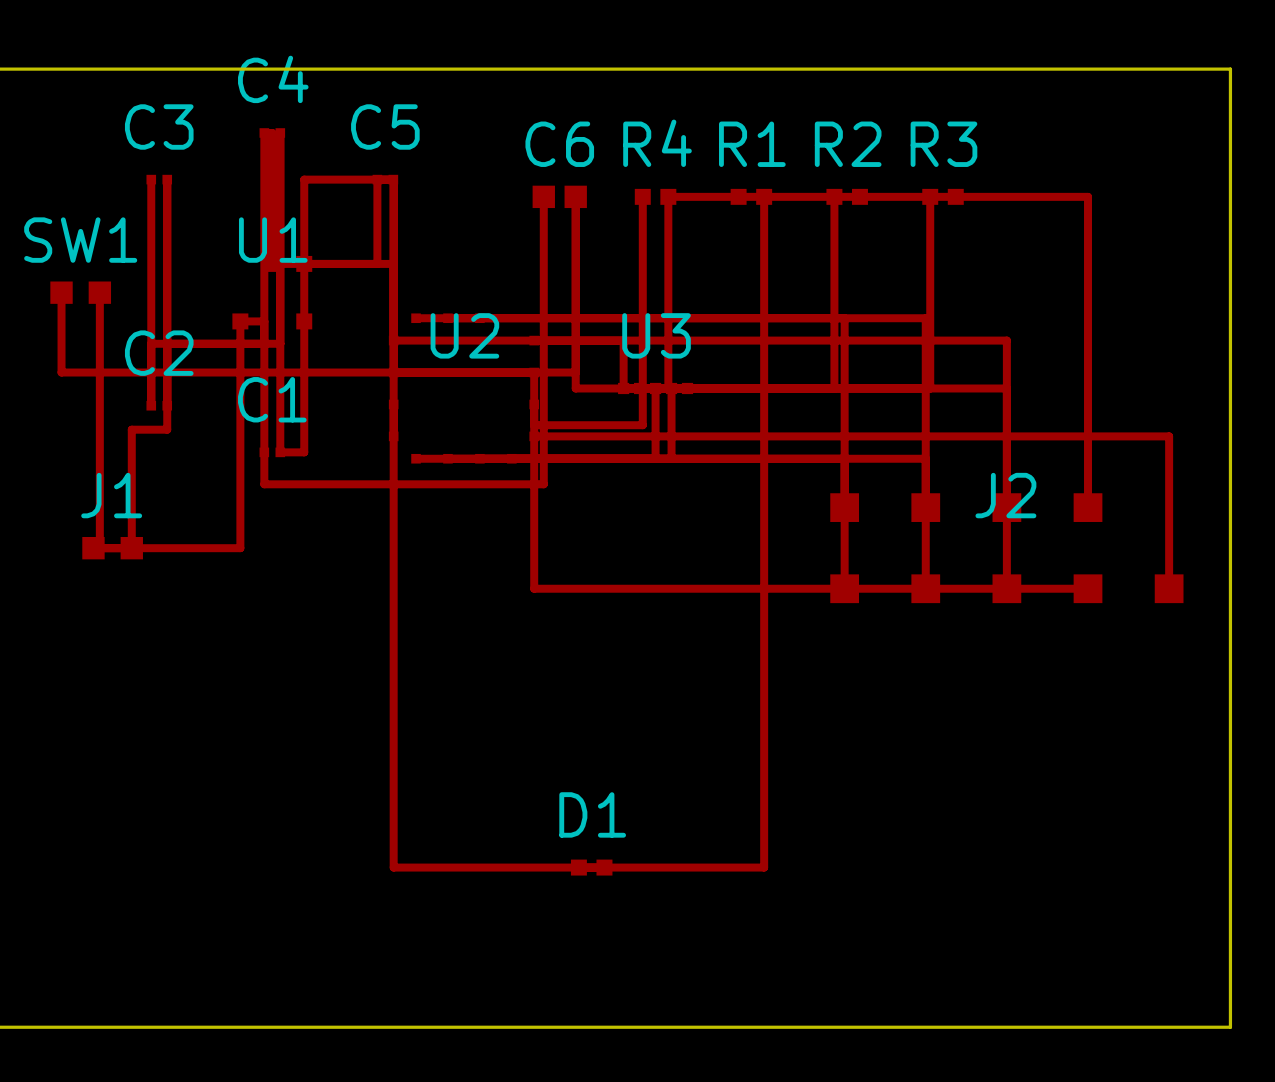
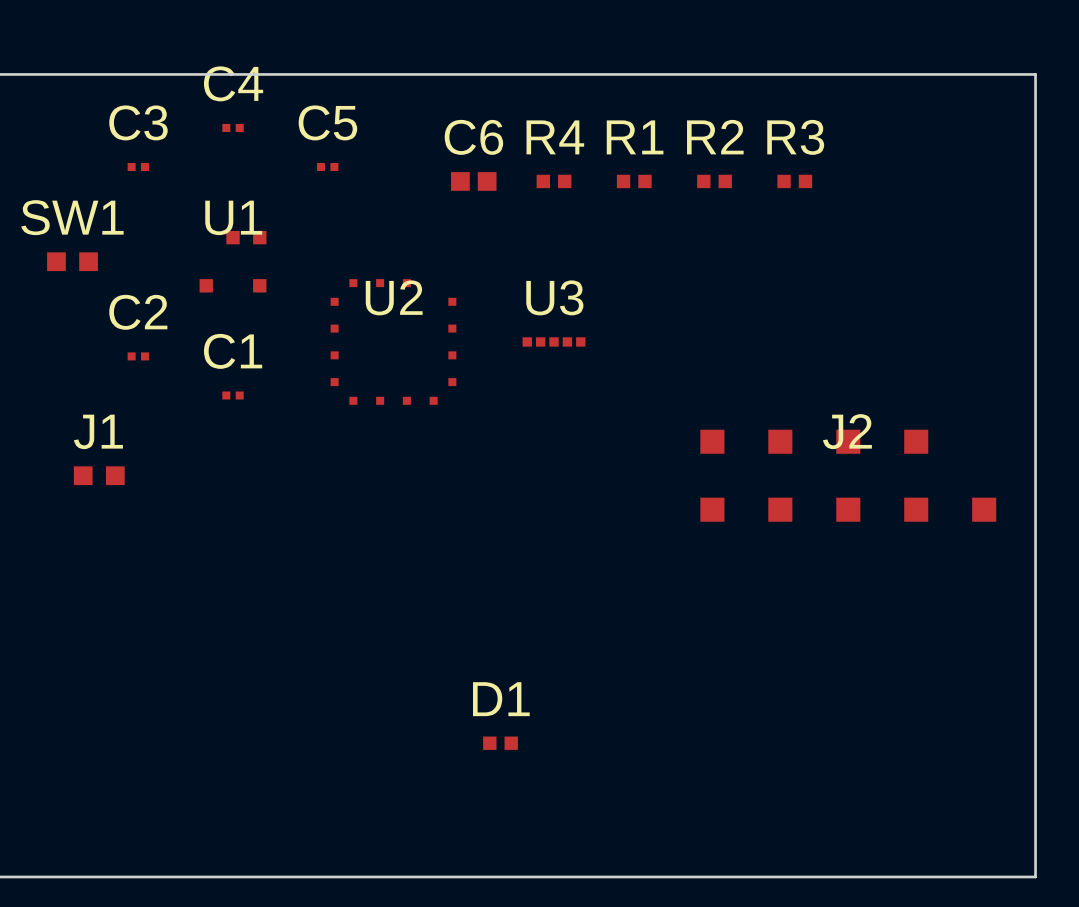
track: (280, 132) (280, 452) (304, 452) (304, 179) (393, 179) (393, 867) (764, 867) (764, 196) -> none
track: (151, 179) (151, 405) -> none
track: (167, 179) (167, 429) (131, 429) (131, 548) -> none
track: (377, 179) (377, 263) -> none
track: (543, 196) (543, 484) (264, 484) (264, 132) (272, 132) (272, 263) (393, 263) -> none
track: (575, 196) (575, 388) (1006, 388) -> none
track: (642, 196) (642, 425) (534, 425) -> none
track: (834, 196) (834, 388) -> none
track: (930, 196) (930, 388) -> none
track: (61, 292) (61, 372) (575, 372) -> none
track: (99, 292) (99, 548) -> none
track: (416, 318) (925, 318) (925, 588) -> none
track: (844, 318) (844, 588) -> none
track: (264, 321) (240, 321) (240, 548) (93, 548) -> none
track: (393, 340) (1006, 340) (1006, 588) -> none
track: (623, 340) (623, 388) -> none
track: (151, 343) (280, 343) -> none
track: (534, 372) (534, 588) (1088, 588) -> none
track: (655, 388) (655, 458) -> none
track: (668, 388) (668, 196) (1088, 196) (1088, 507) -> none
track: (671, 388) (671, 458) -> none
track: (534, 436) (1169, 436) (1169, 588) -> none
track: (416, 458) (925, 458) -> none

